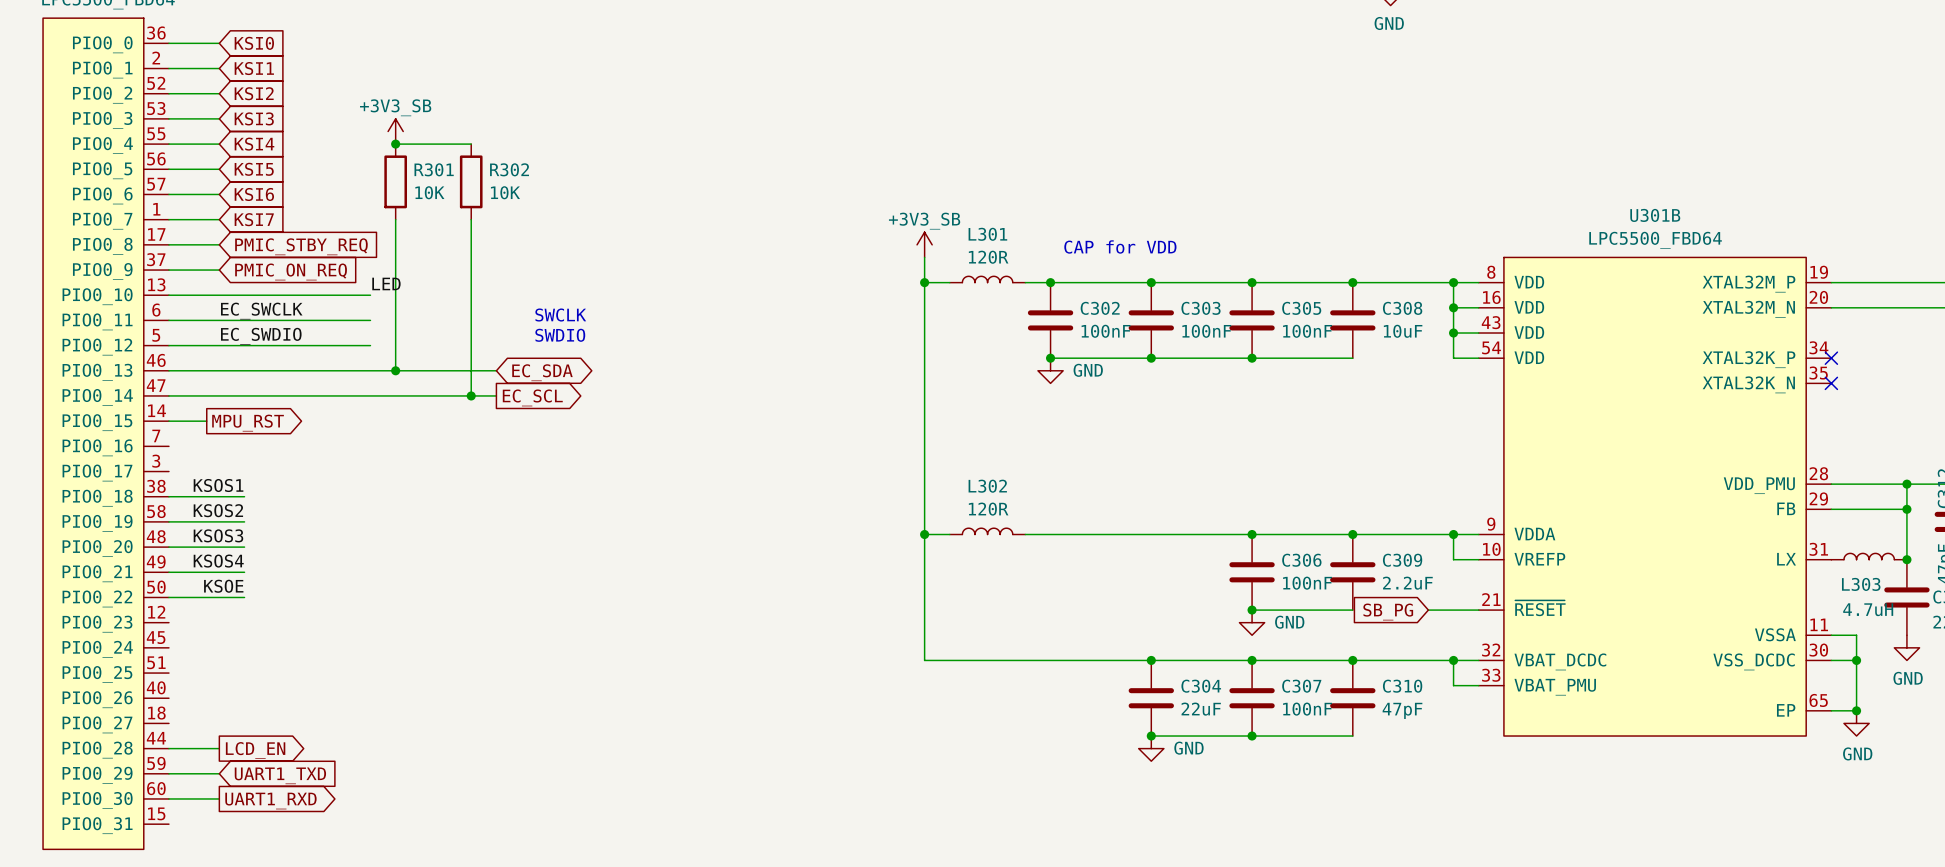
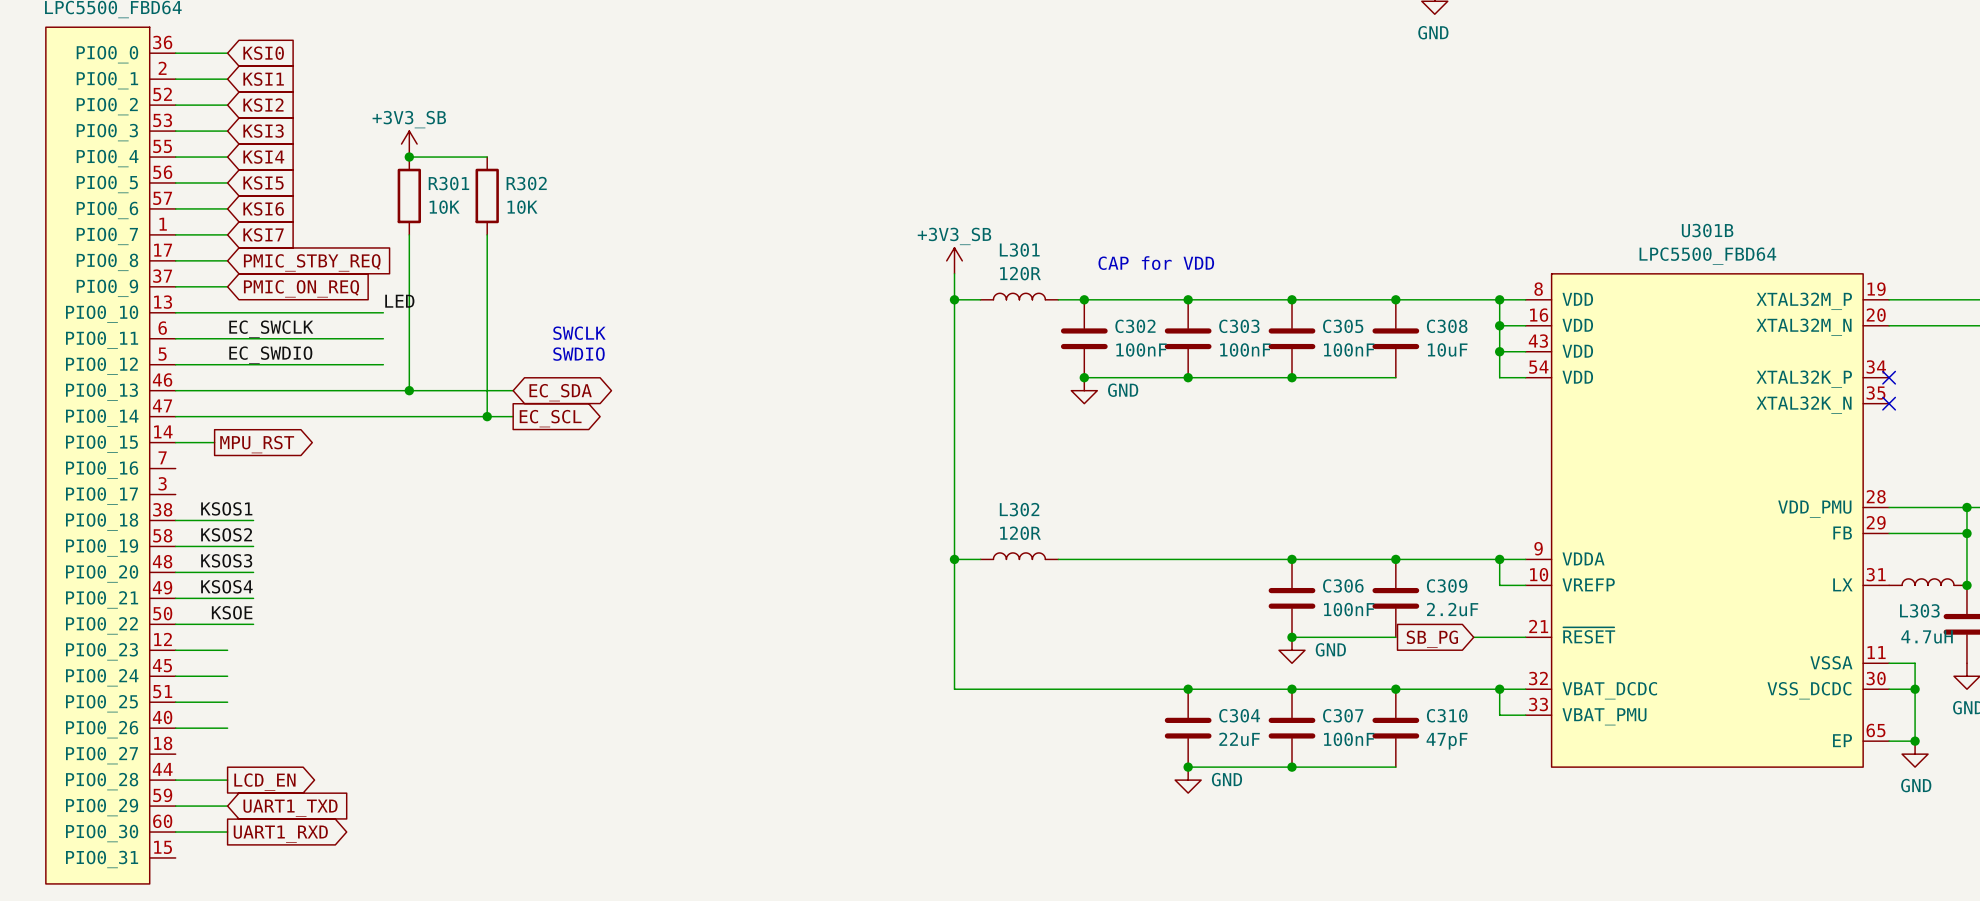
wire: none -> (175, 650) (227, 650)
wire: none -> (175, 676) (227, 676)
wire: none -> (175, 702) (227, 702)
wire: none -> (175, 728) (227, 728)

